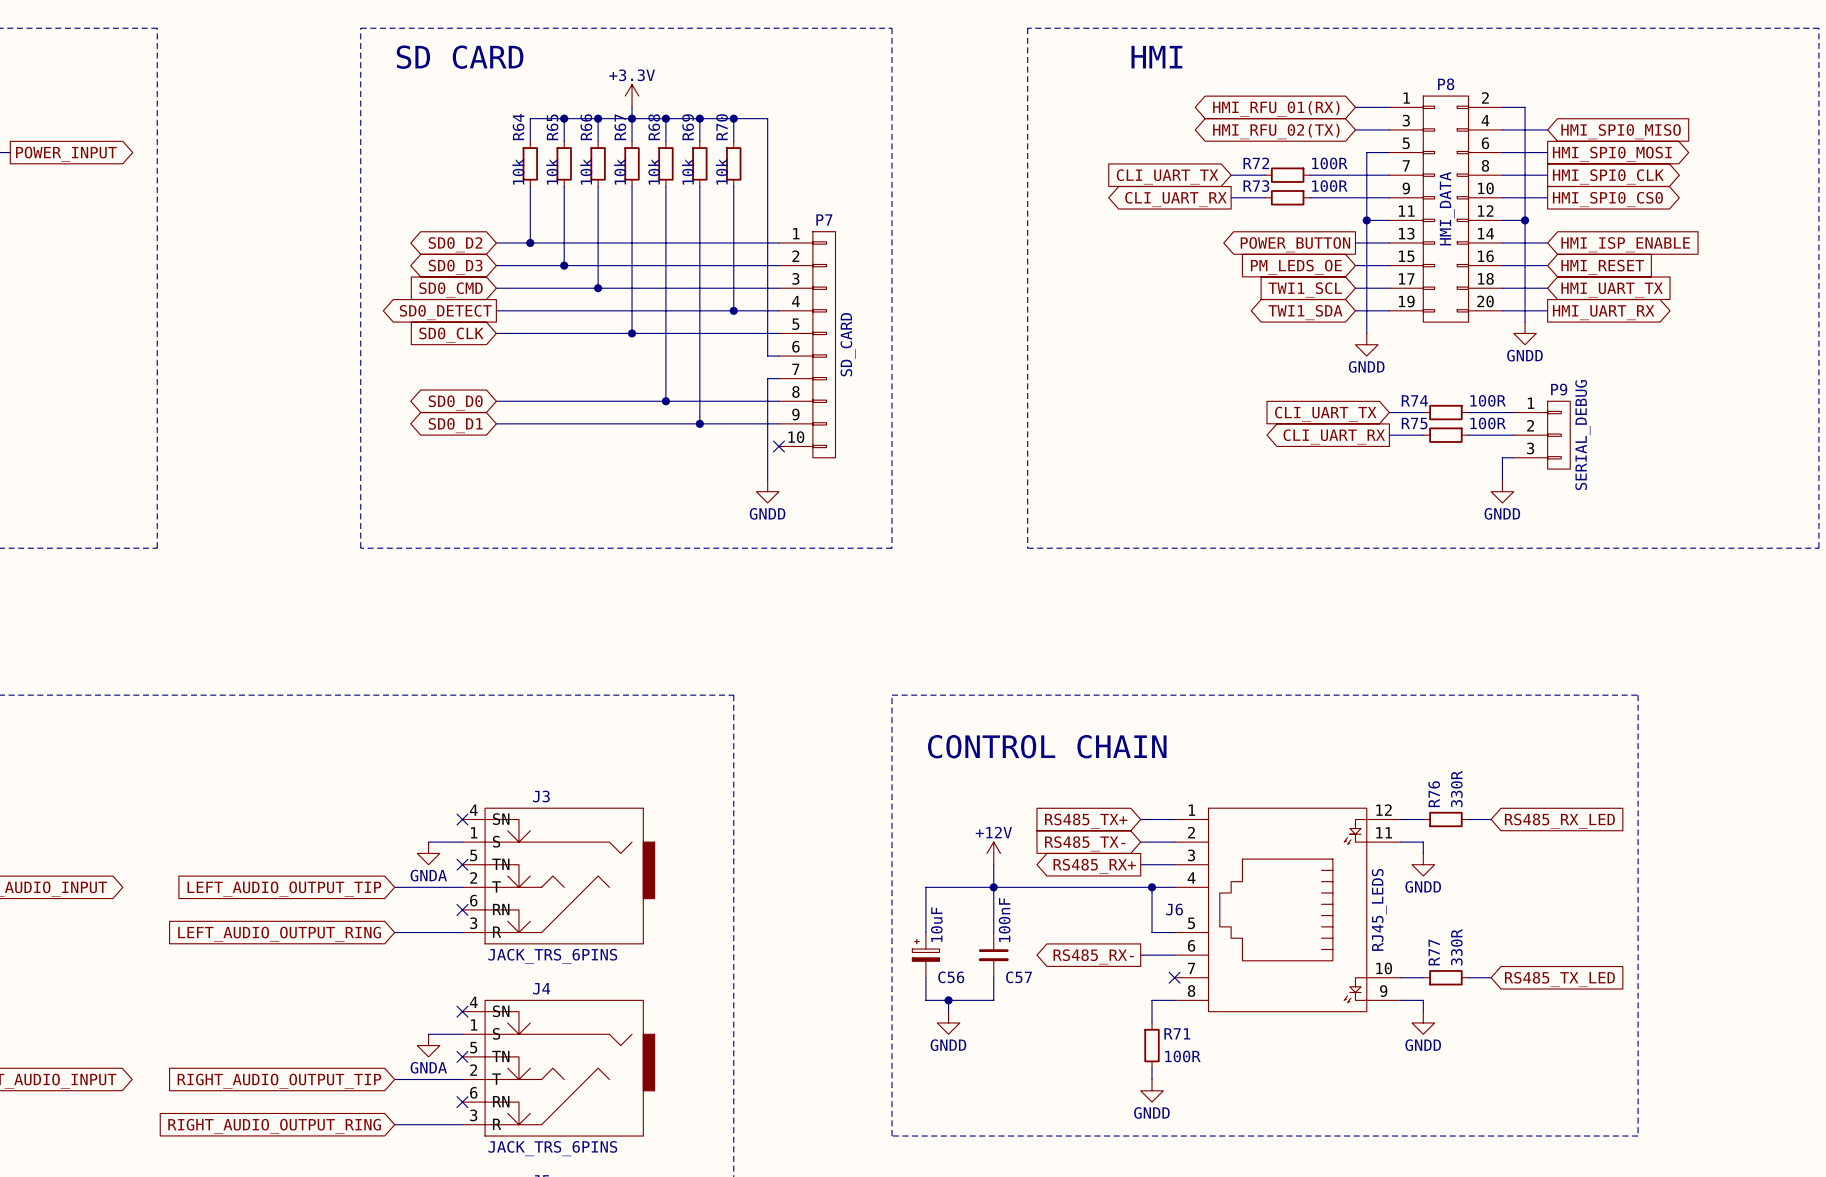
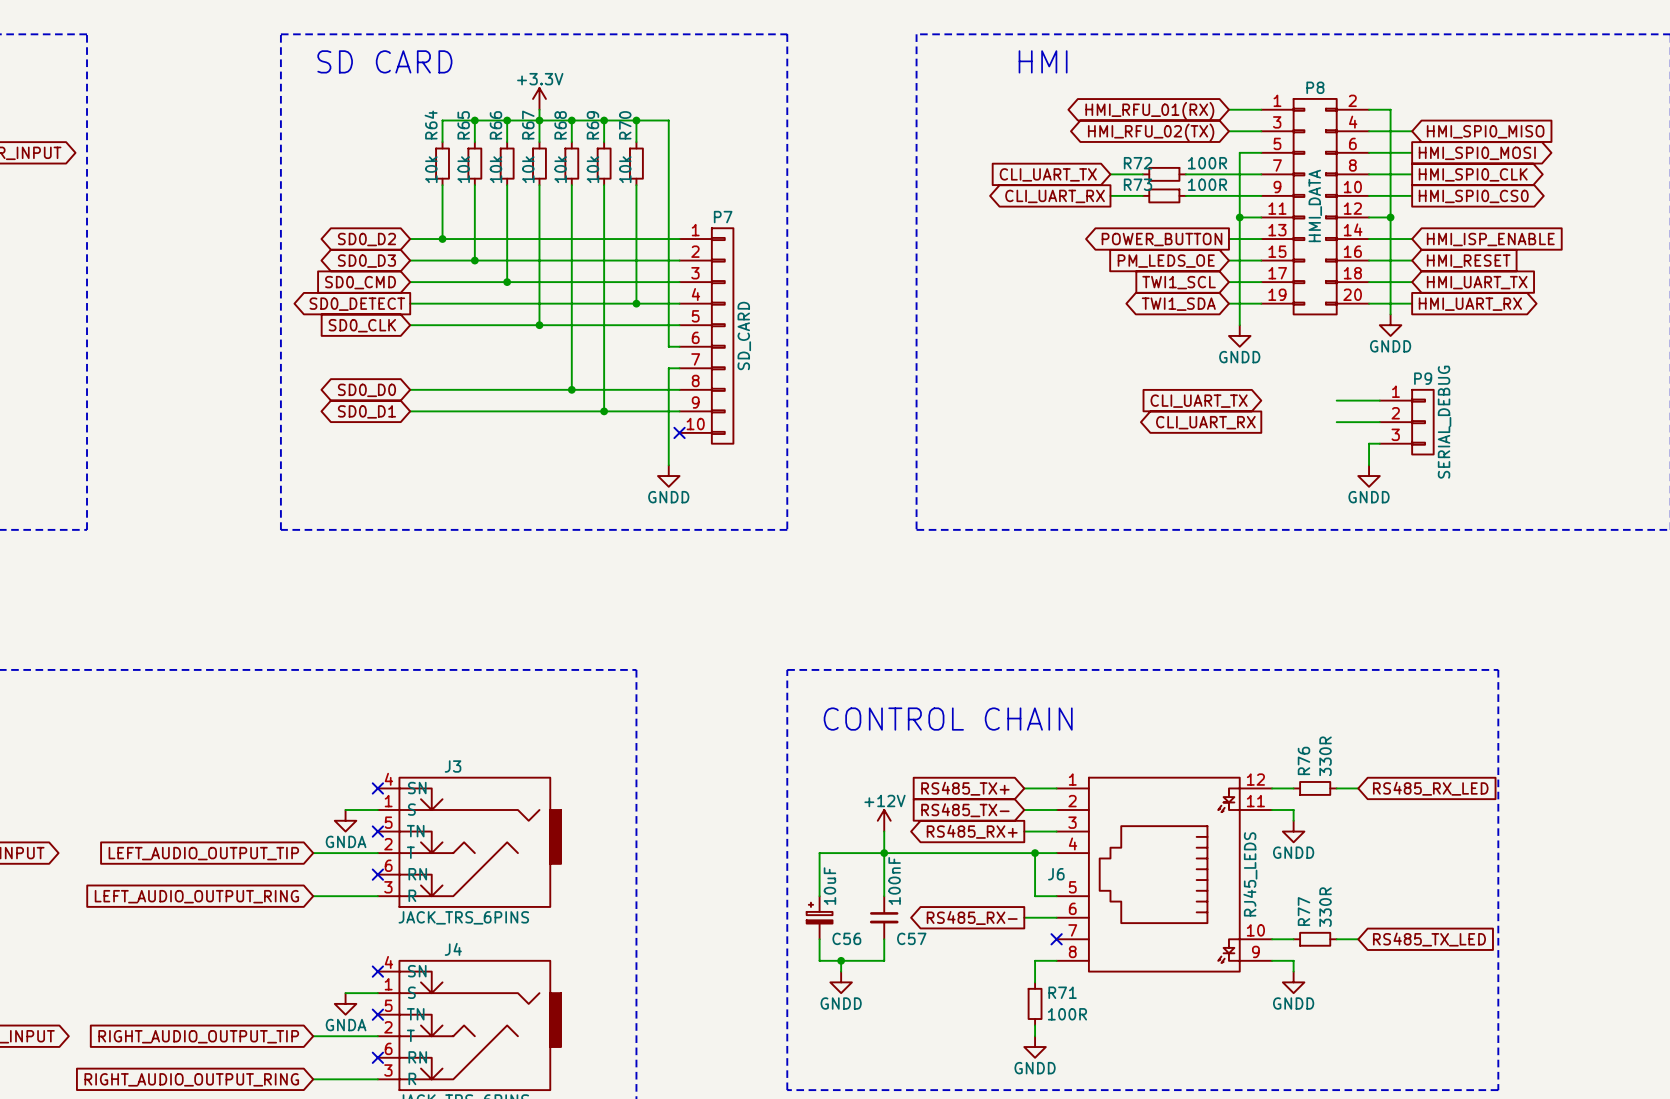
wire: (1389, 412) (1423, 412) -> none
R74: 100R (1445, 412) -> none
wire: (1389, 435) (1423, 435) -> none
R75: 100R (1445, 435) -> none

